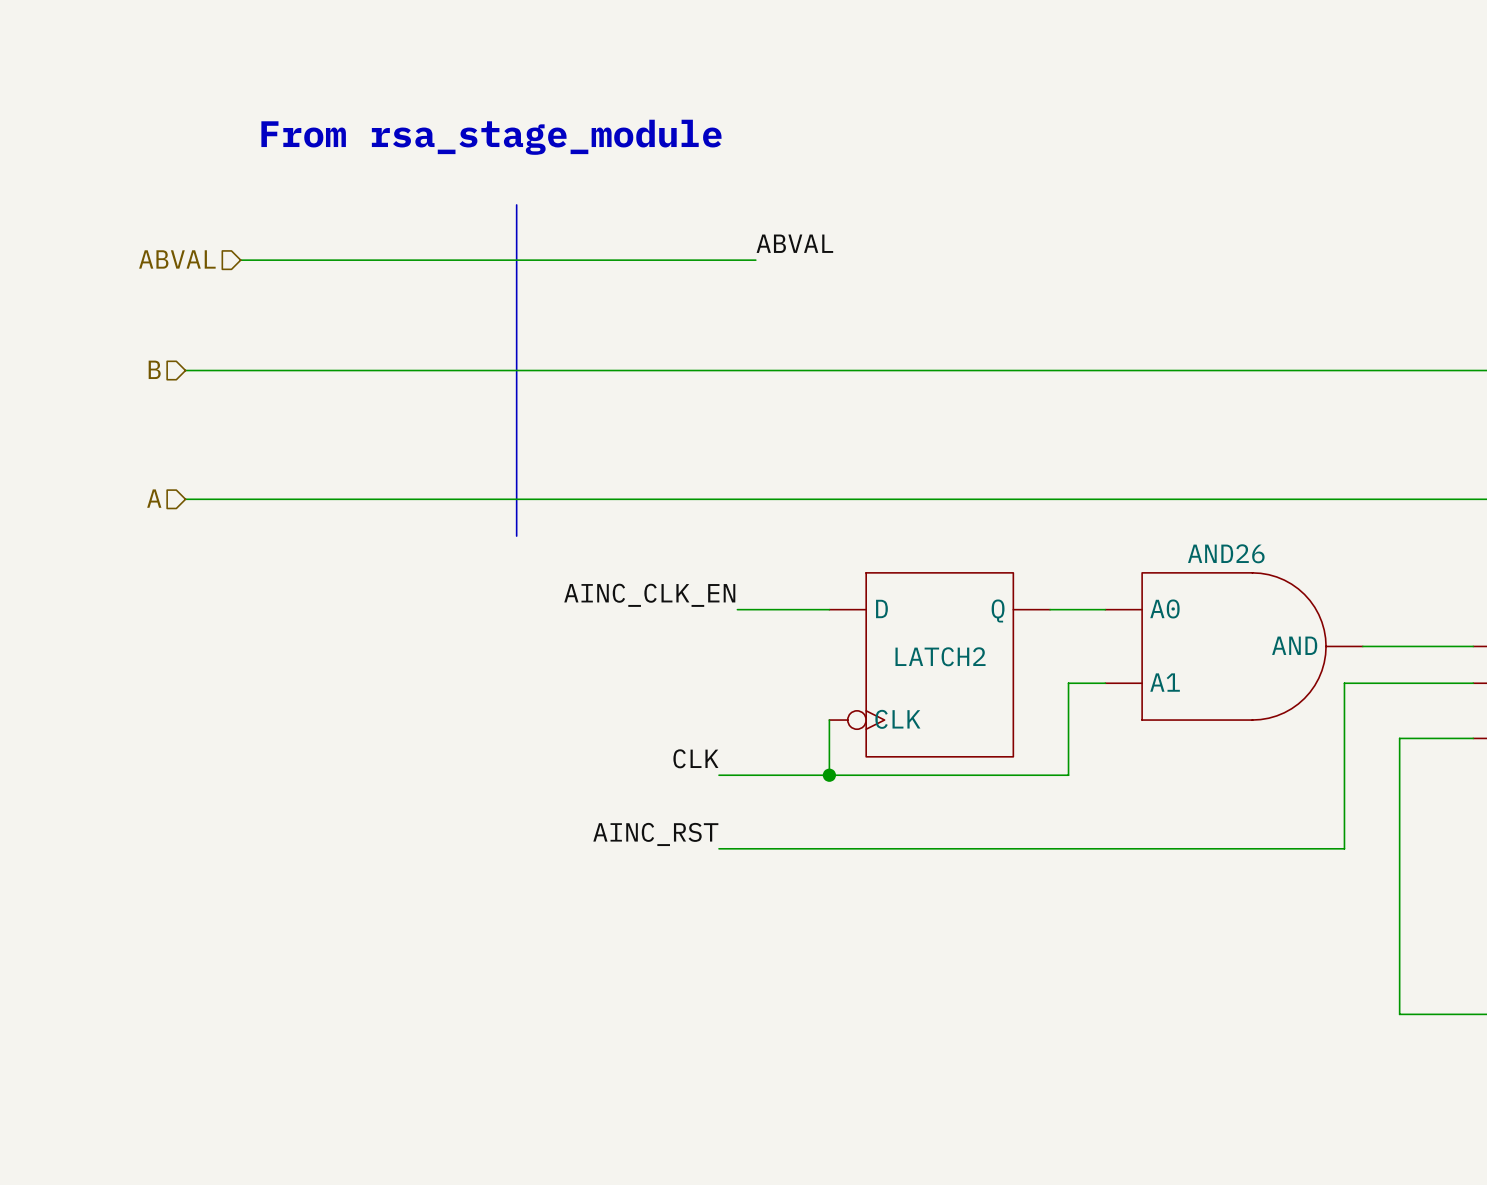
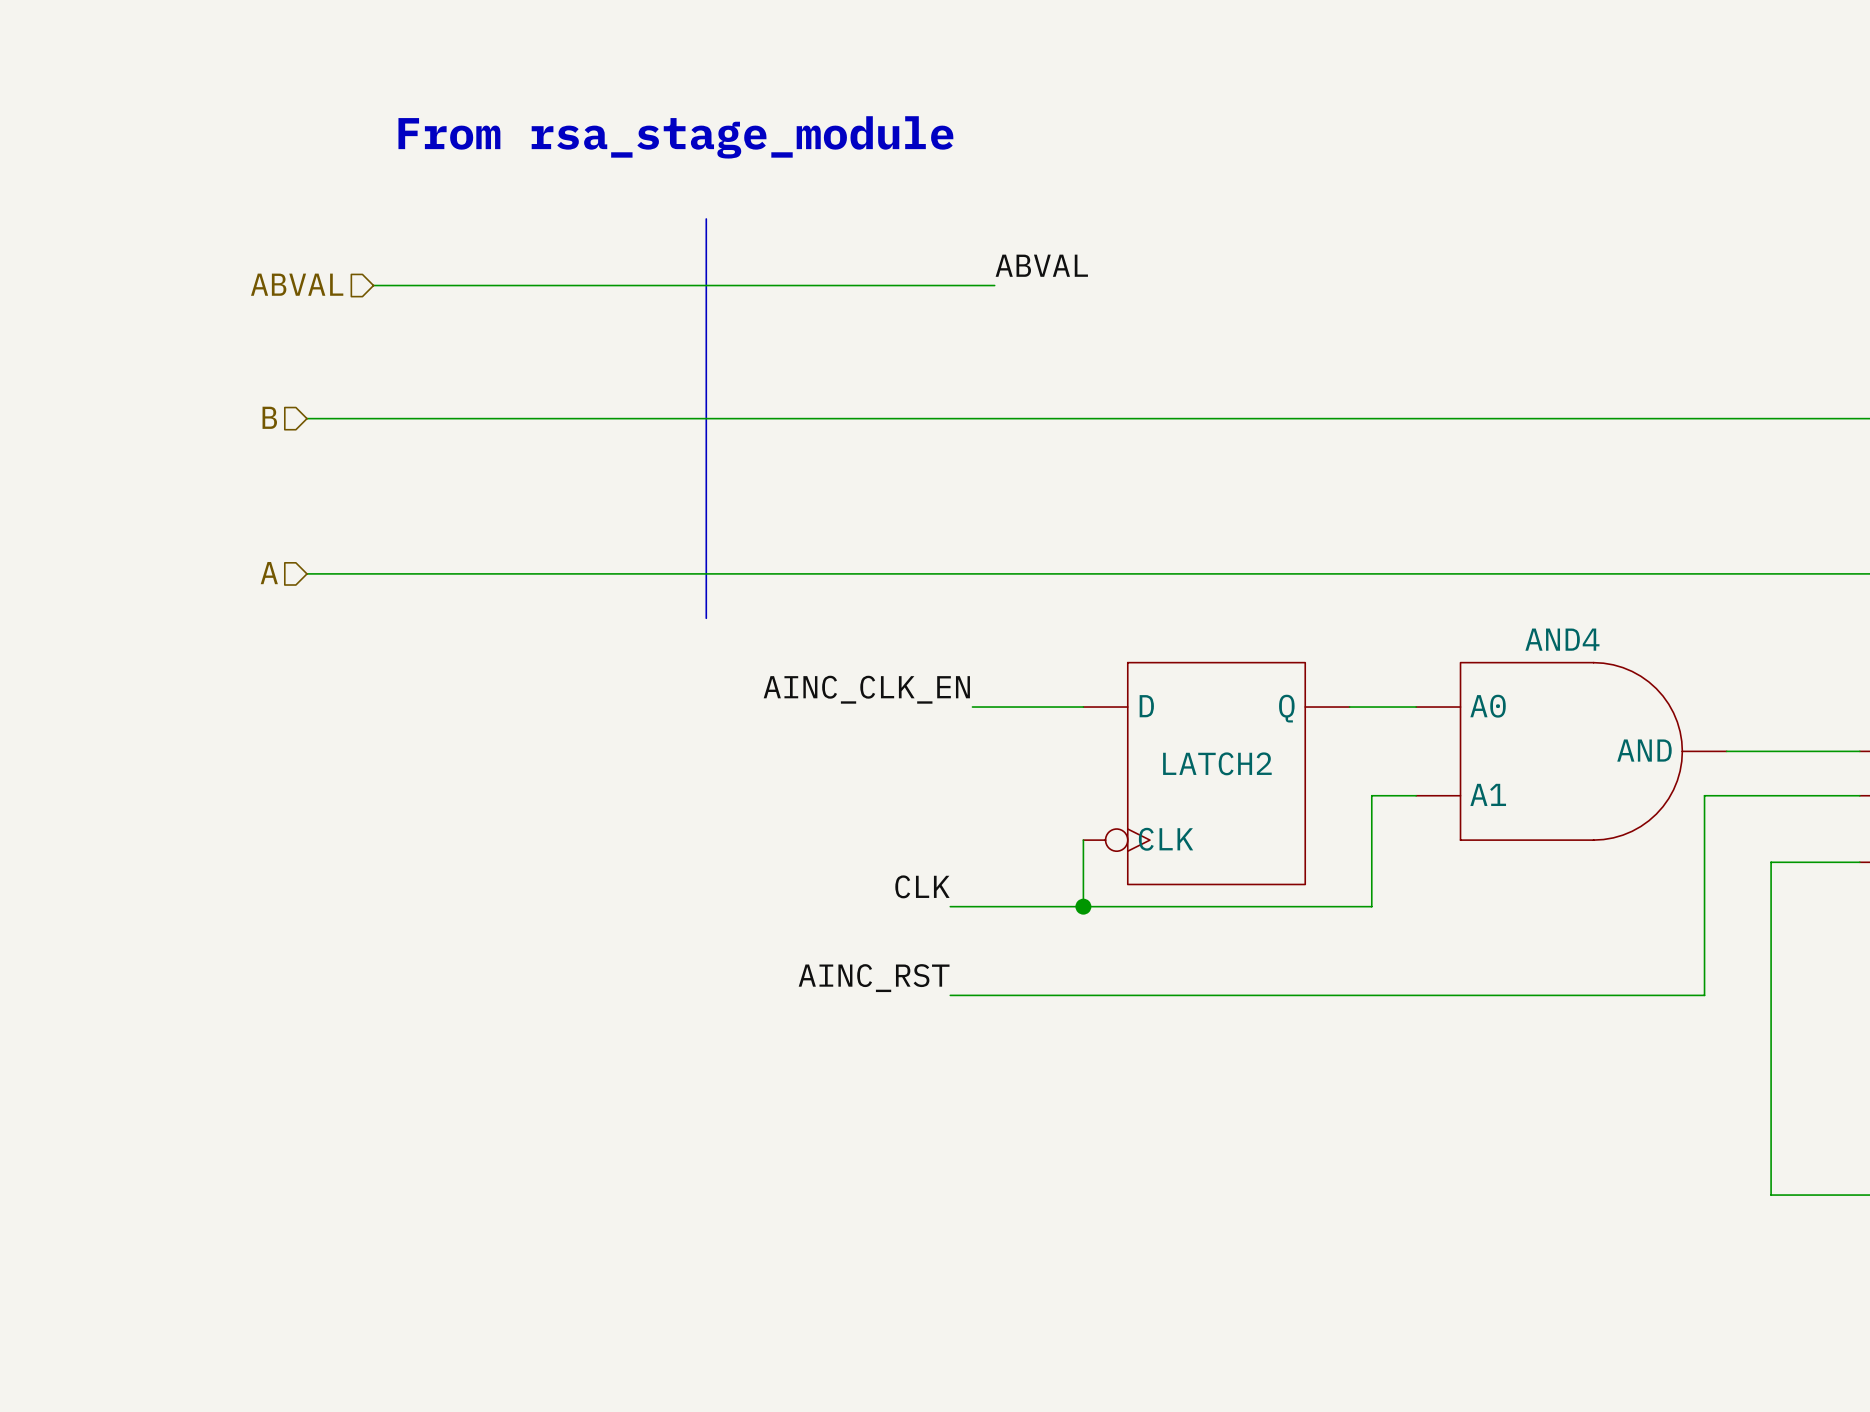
AND26 name: AND26 (1226, 553) -> AND4 (1562, 639)

